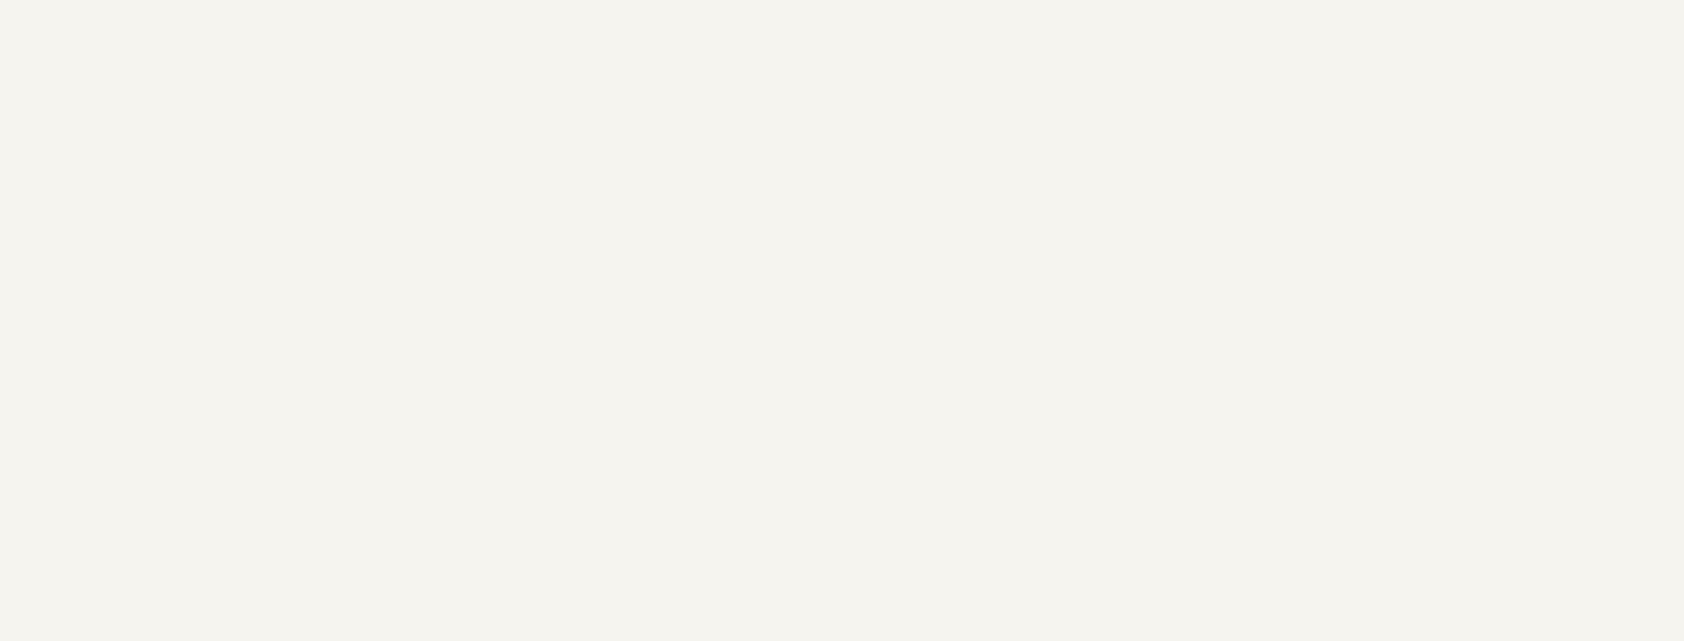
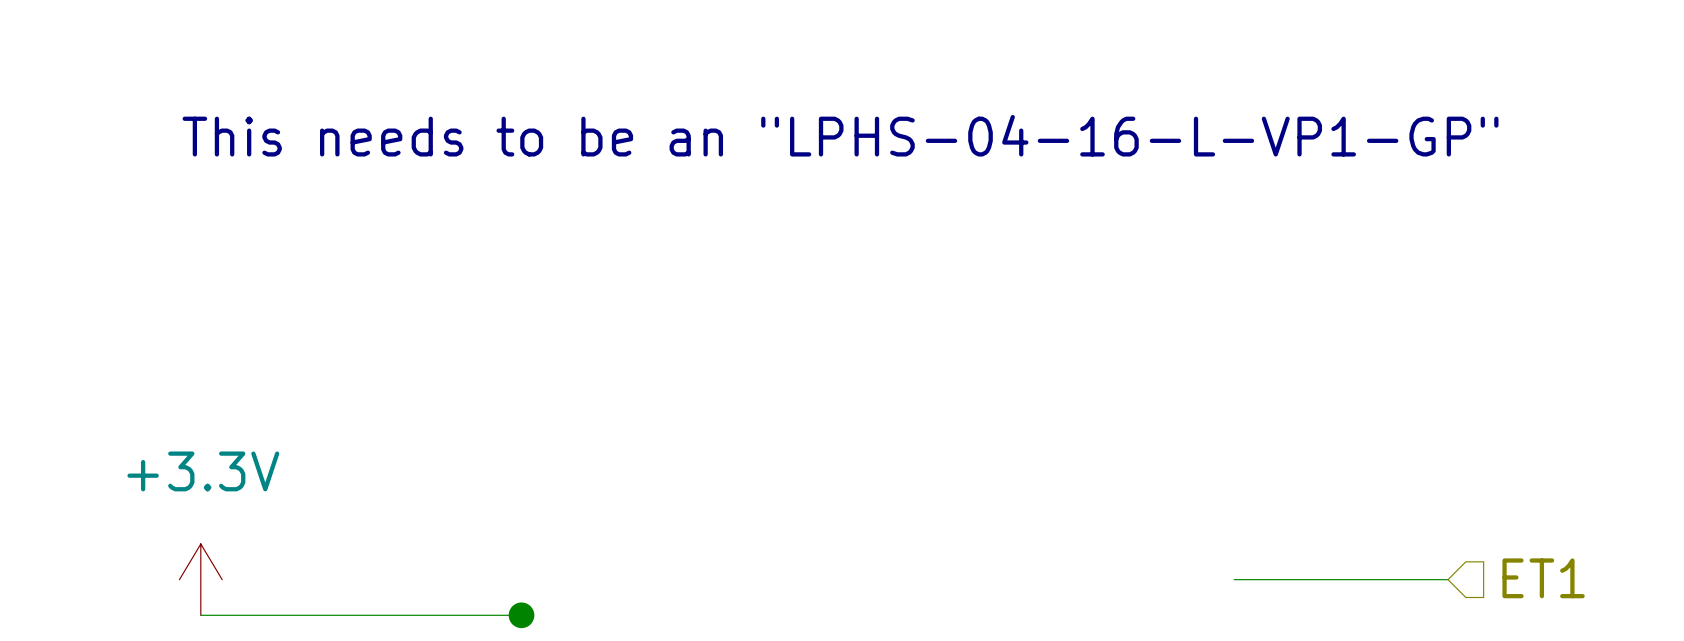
text: none -> This needs to be an "LPHS-04-16-L-VP1-GP" (840, 135)
hierarchical label: none -> ET1 (1543, 578)
power symbol: none -> +3.3V (200, 579)
wire: none -> (1234, 579) (1447, 579)
wire: none -> (200, 615) (521, 615)
junction: none -> (521, 615)

